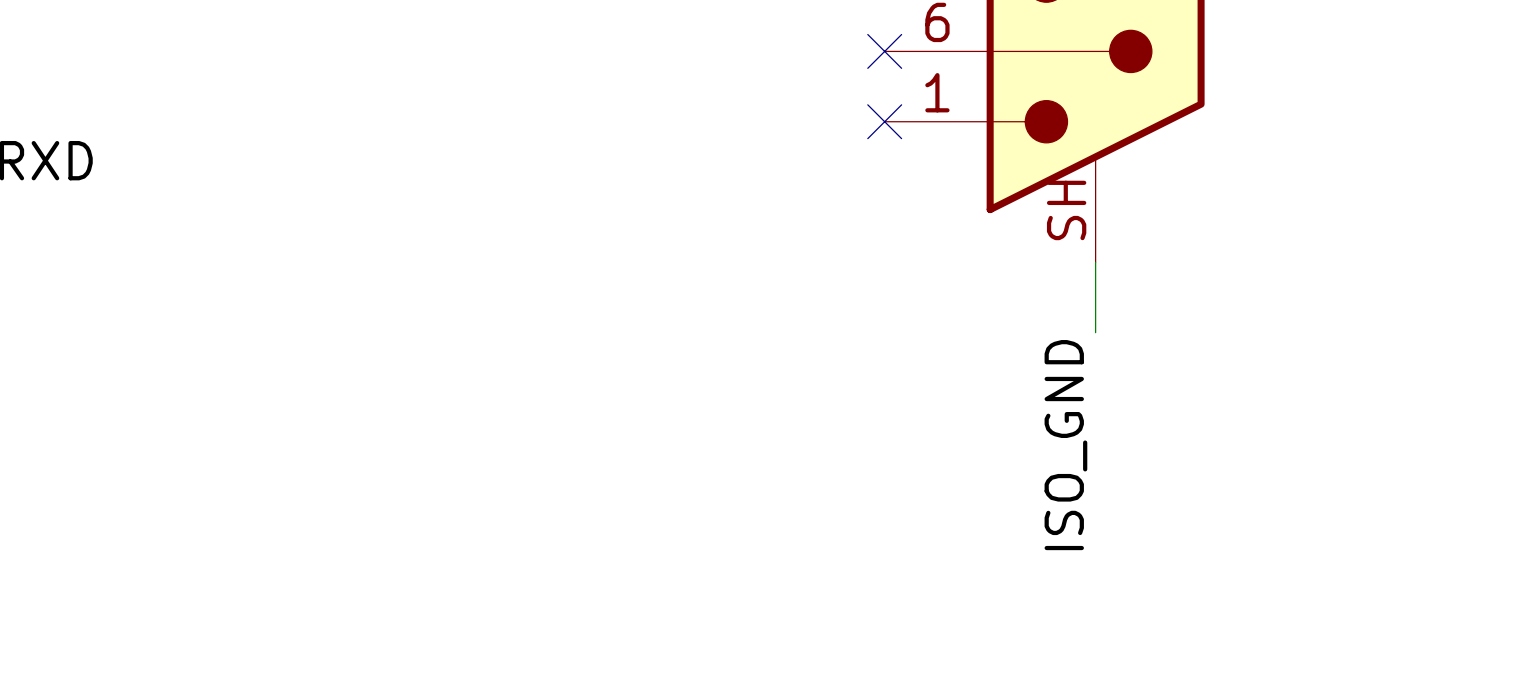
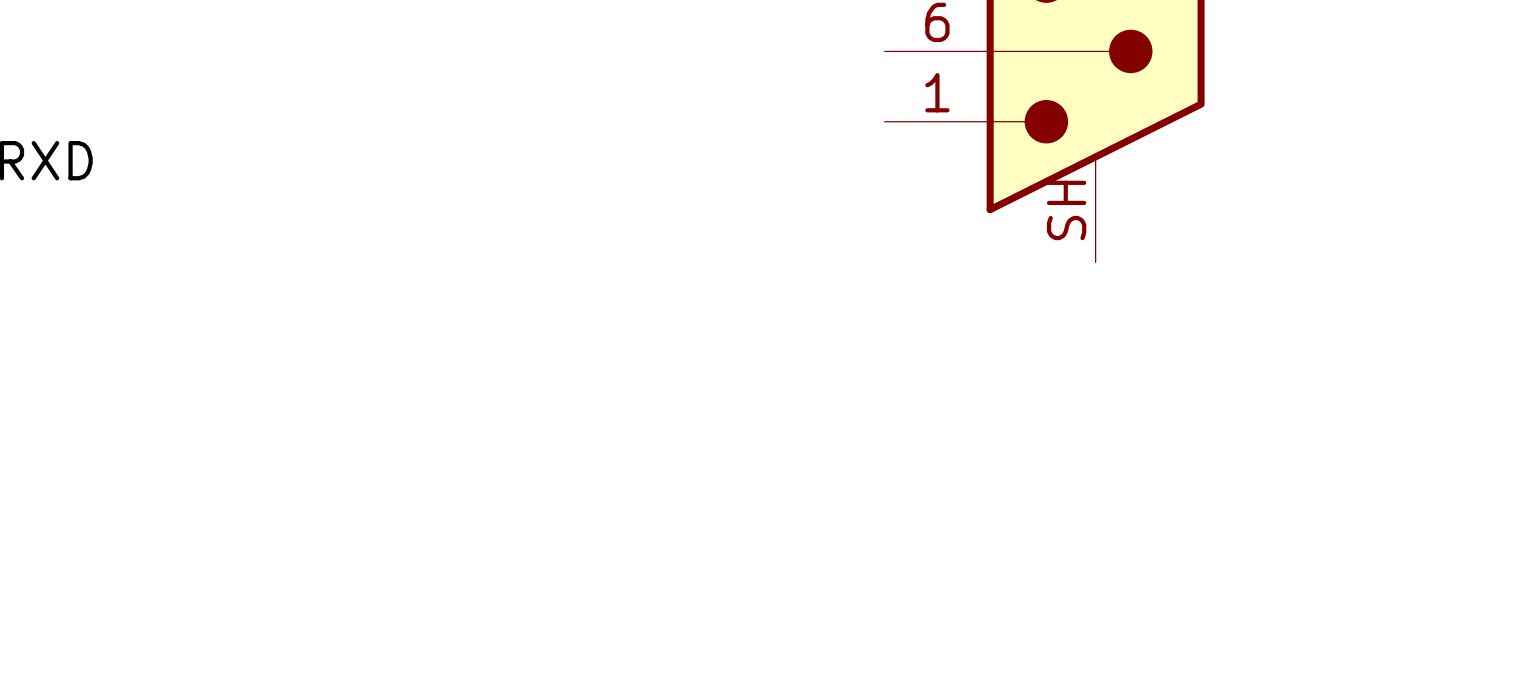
no-connect mark: (884, 51) -> none
no-connect mark: (884, 121) -> none
wire: (1095, 262) (1095, 332) -> none
label: ISO_GND (1065, 445) -> none

